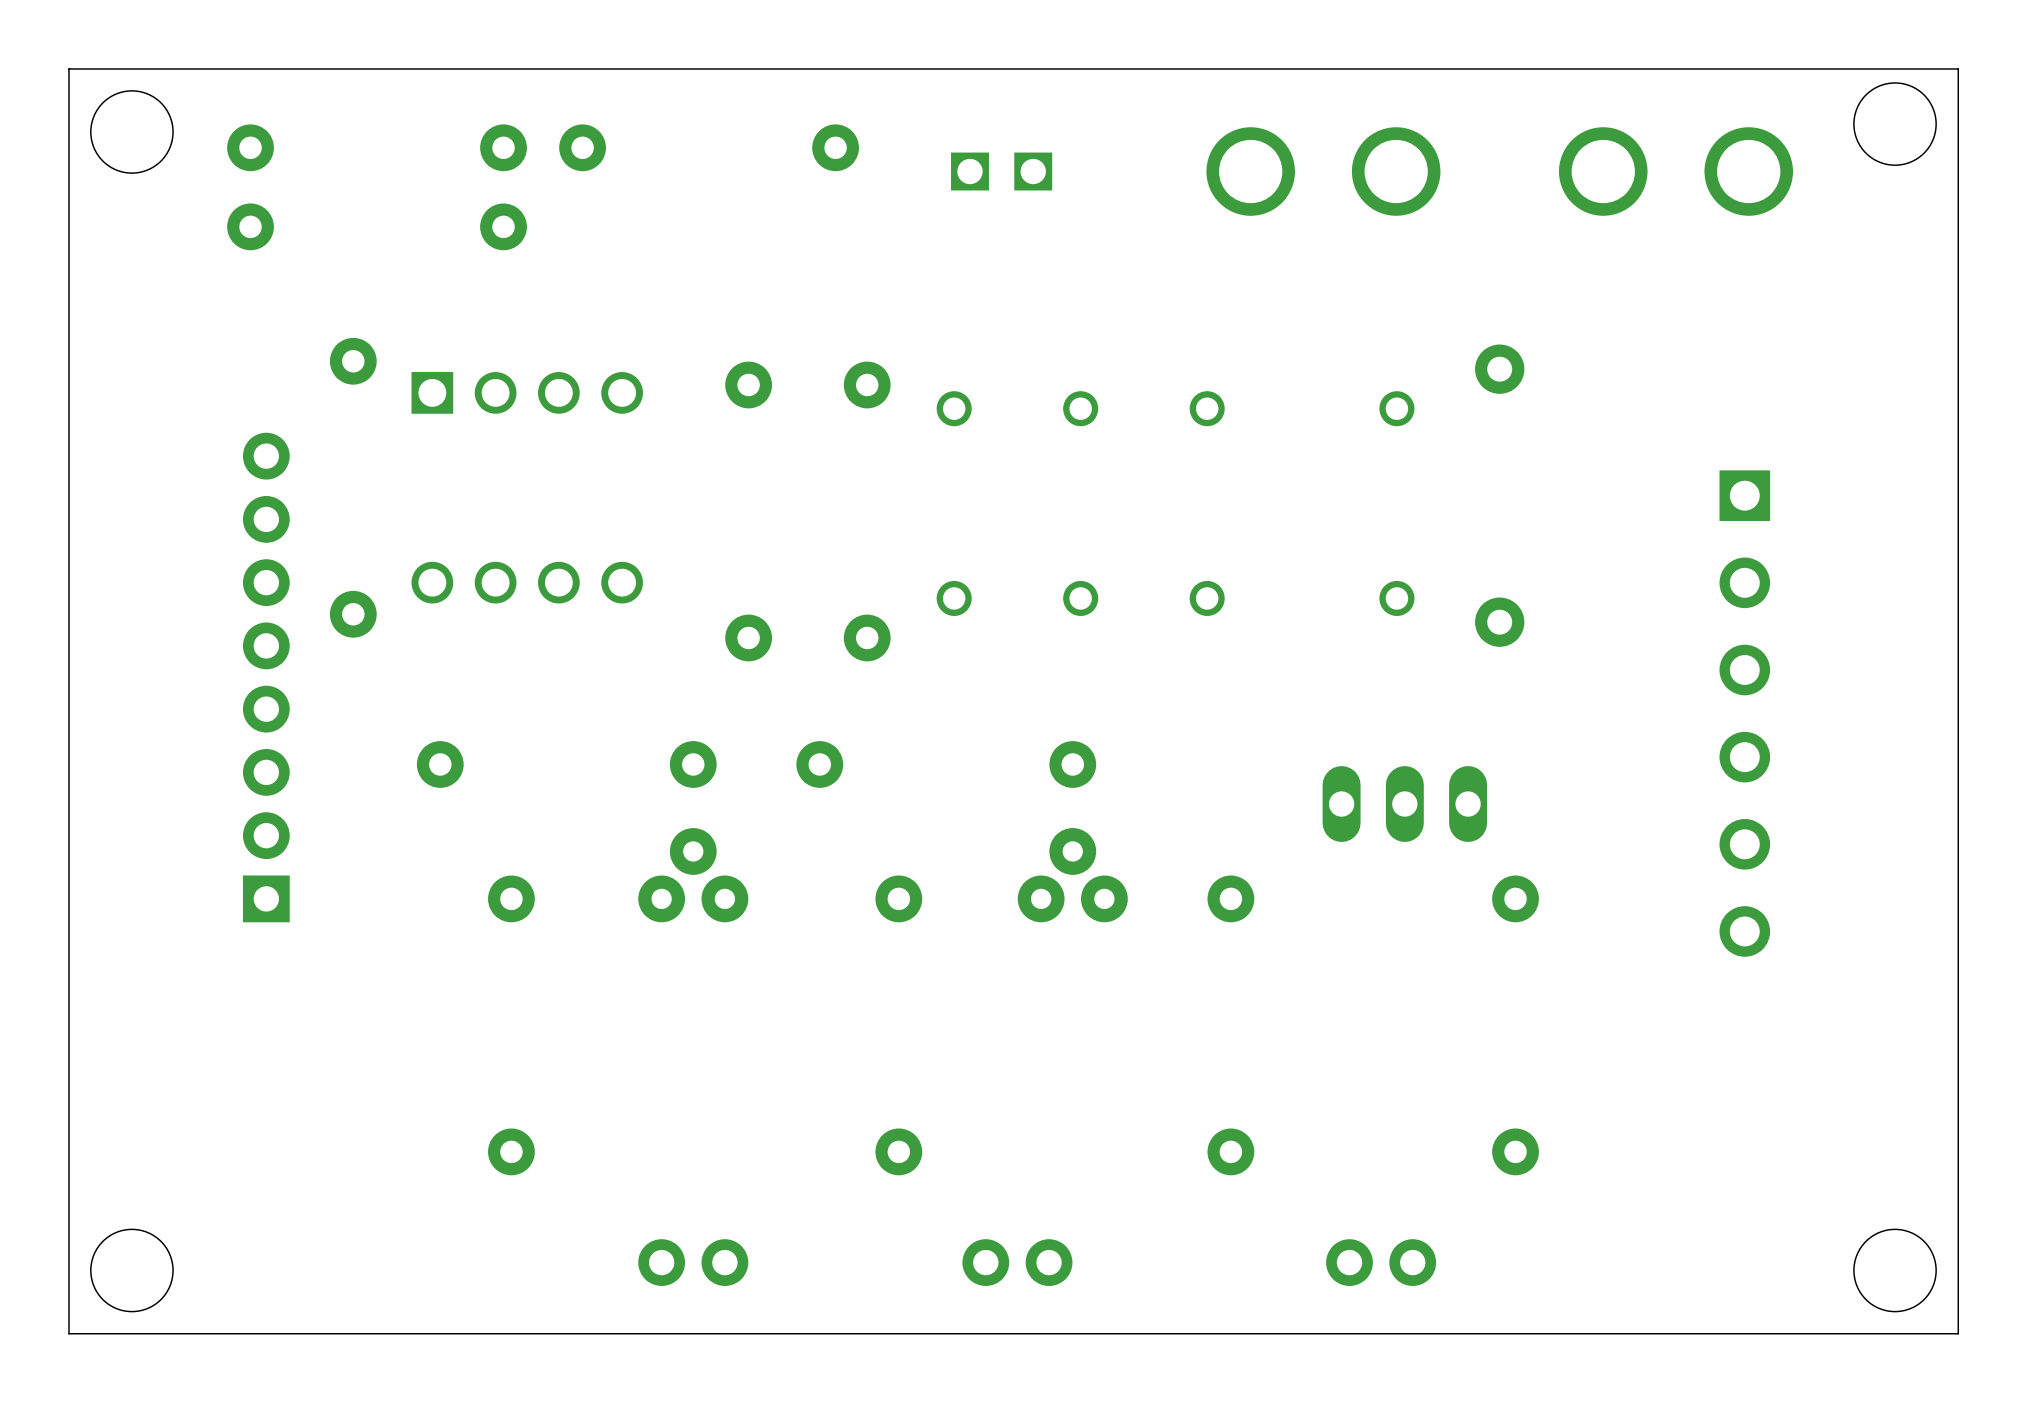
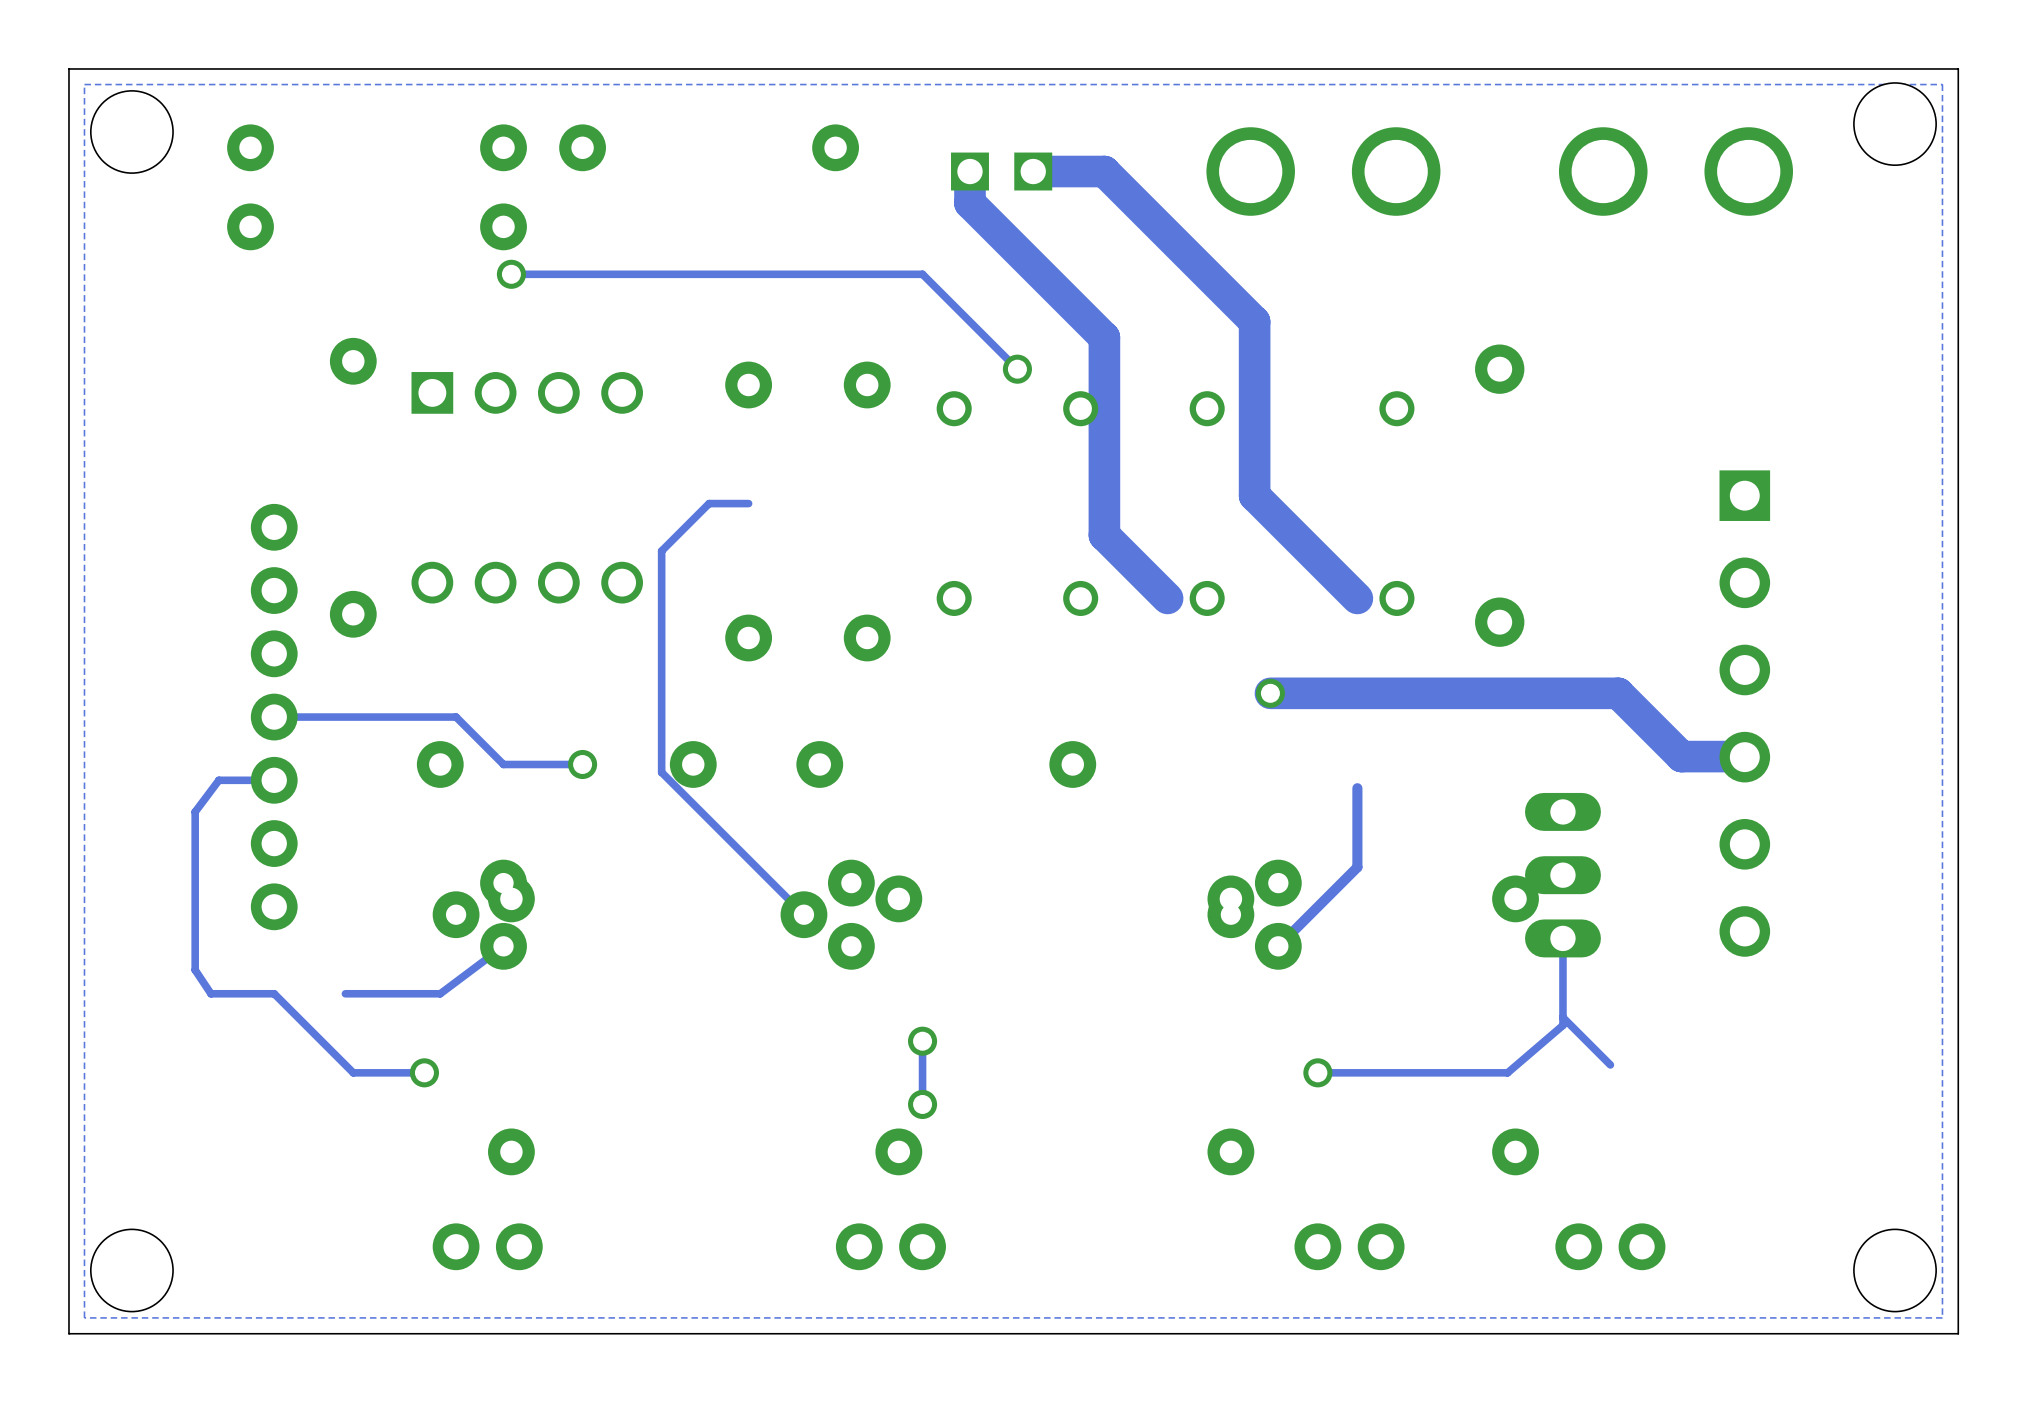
zone outline: none -> (1942, 84) (1942, 1317) (84, 1317) (84, 84) (1942, 84)
track: none -> (969, 171) (969, 203) (1104, 337) (1104, 535) (1167, 598)
track: none -> (1033, 171) (1104, 171) (1254, 321) (1254, 495) (1357, 598)
track: none -> (511, 274) (922, 274) (1017, 369)
via: none -> (511, 274)
via: none -> (1017, 369)
track: none -> (748, 503) (709, 503) (661, 551) (661, 772) (803, 914)
part: (266, 677) -> none
track: none -> (1270, 693) (1618, 693) (1681, 756) (1744, 757)
via: none -> (1270, 693)
track: none -> (274, 717) (456, 717) (503, 764) (582, 764)
part: none -> (274, 717)
via: none -> (582, 764)
track: none -> (274, 780) (218, 780) (195, 811) (195, 970) (210, 993) (274, 993) (353, 1072) (424, 1072)
track: none -> (1357, 788) (1357, 867) (1278, 946)
part rotation: 0° (1404, 804) -> 90° clockwise (1562, 875)
part position: (1404, 804) -> (1562, 875)
part: (693, 875) -> none
part: (1072, 875) -> none
part: none -> (479, 914)
part: none -> (827, 914)
part: none -> (1254, 914)
track: none -> (1562, 938) (1562, 1025) (1507, 1072) (1317, 1072)
track: none -> (503, 946) (440, 993) (345, 993)
track: none -> (1562, 1017) (1610, 1064)
track: none -> (922, 1041) (922, 1104)
via: none -> (922, 1041)
via: none -> (424, 1072)
via: none -> (1317, 1072)
via: none -> (922, 1104)
part: none -> (487, 1246)
part: none -> (890, 1246)
part: none -> (1610, 1246)
part: (693, 1262) -> none
part: (1017, 1262) -> none
part position: (1381, 1262) -> (1349, 1246)

